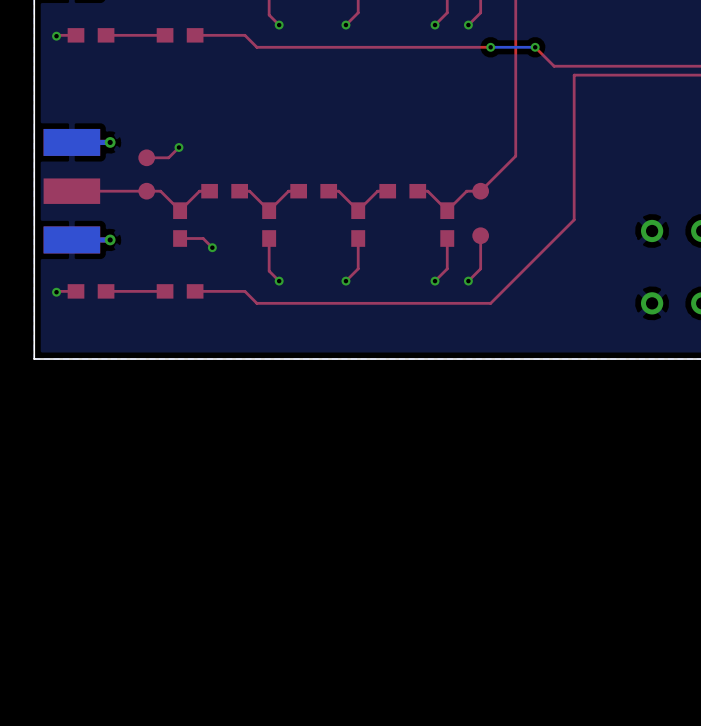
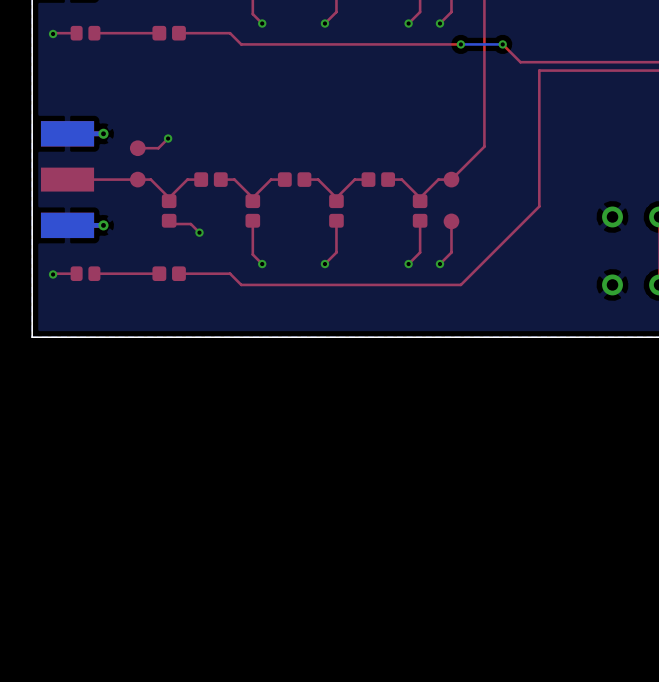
part footprint: [67, 28, 115, 43] -> [70, 25, 101, 41]
part footprint: [156, 28, 204, 43] -> [152, 25, 186, 41]
part footprint: [201, 183, 249, 199] -> [194, 172, 228, 187]
part footprint: [290, 183, 338, 199] -> [277, 172, 312, 187]
part footprint: [379, 183, 427, 199] -> [361, 172, 396, 187]
part footprint: [173, 202, 188, 247] -> [161, 194, 177, 228]
part footprint: [262, 202, 277, 247] -> [245, 194, 261, 228]
part footprint: [351, 202, 366, 247] -> [329, 194, 344, 228]
part footprint: [440, 202, 455, 247] -> [412, 194, 428, 228]
part footprint: [67, 284, 115, 299] -> [70, 266, 101, 282]
part footprint: [156, 284, 204, 299] -> [152, 266, 186, 282]

